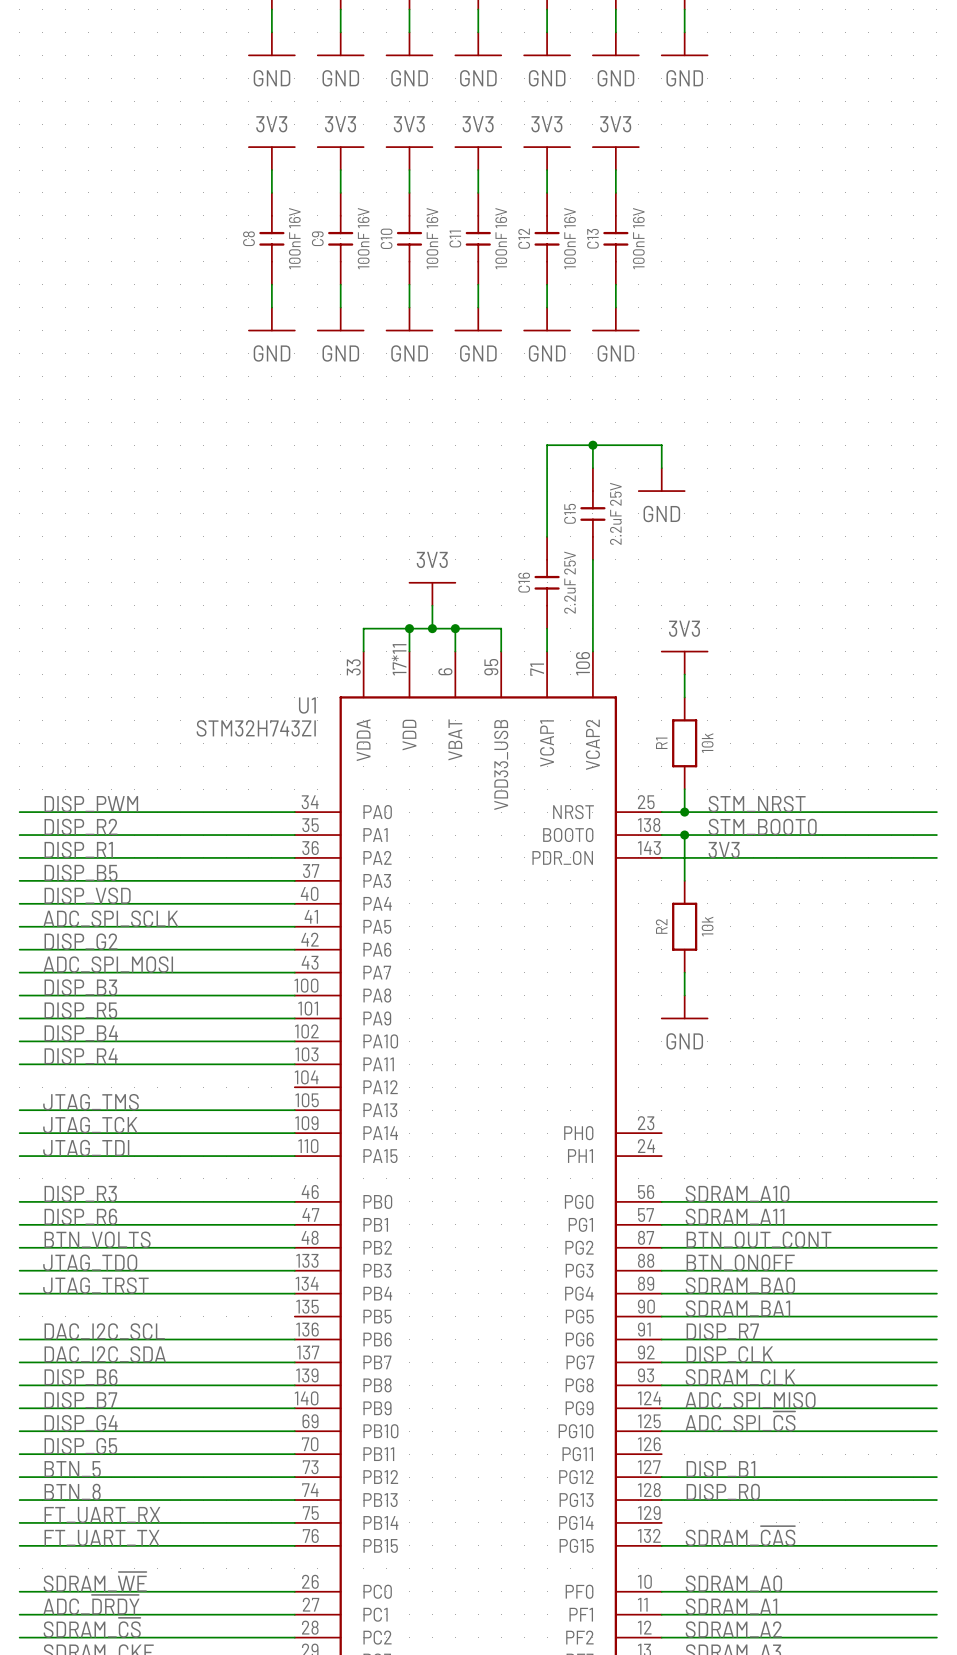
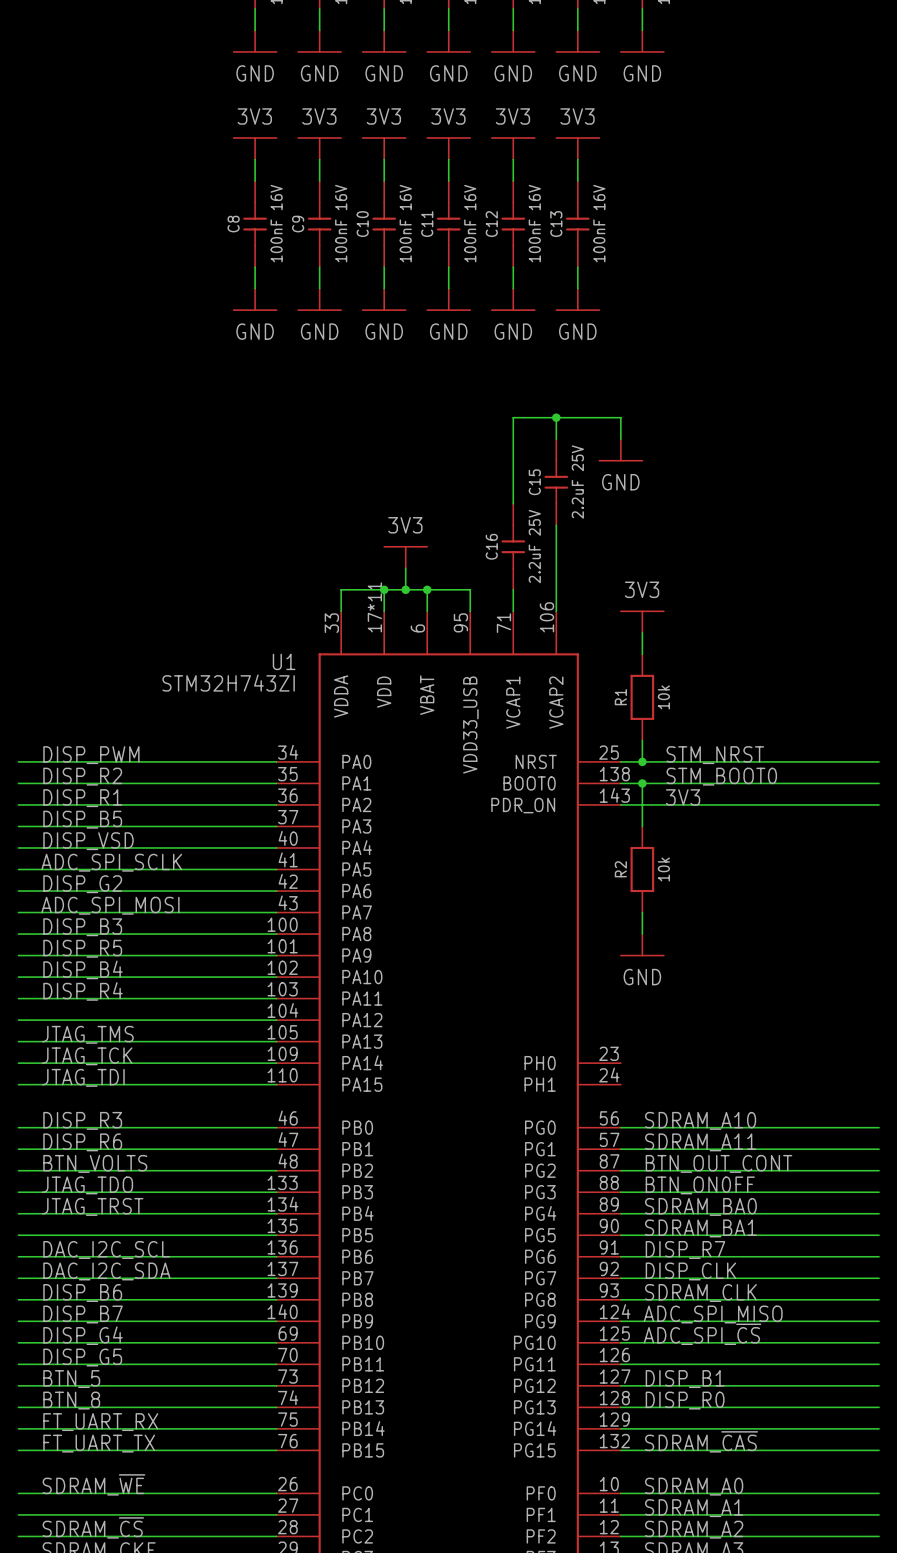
wire: none -> (18, 1020) (276, 1020)
wire: none -> (18, 1235) (276, 1235)
wire: none -> (620, 1364) (879, 1364)
wire: none -> (620, 1428) (879, 1428)
label: ADC_~{DRDY} (91, 1604) -> none

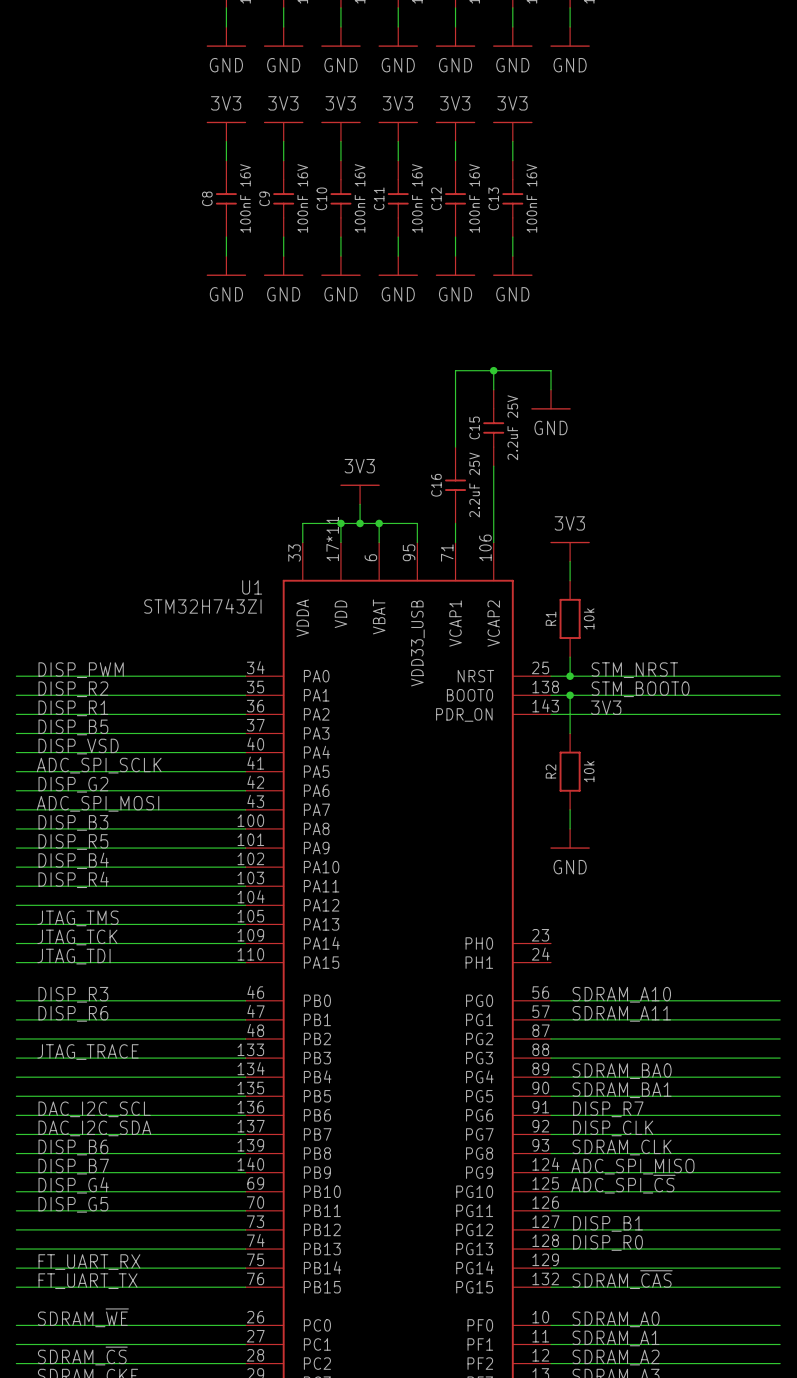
label: BTN_VOLTS (95, 1163) -> none
label: BTN_OUT_CONT (719, 1163) -> none
label: JTAG_TDO (87, 1185) -> JTAG_TRACE (88, 1052)
label: BTN_ON0FF (700, 1185) -> none
label: JTAG_TRST (92, 1206) -> none
label: BTN_5 (71, 1379) -> none
label: BTN_8 (71, 1400) -> none

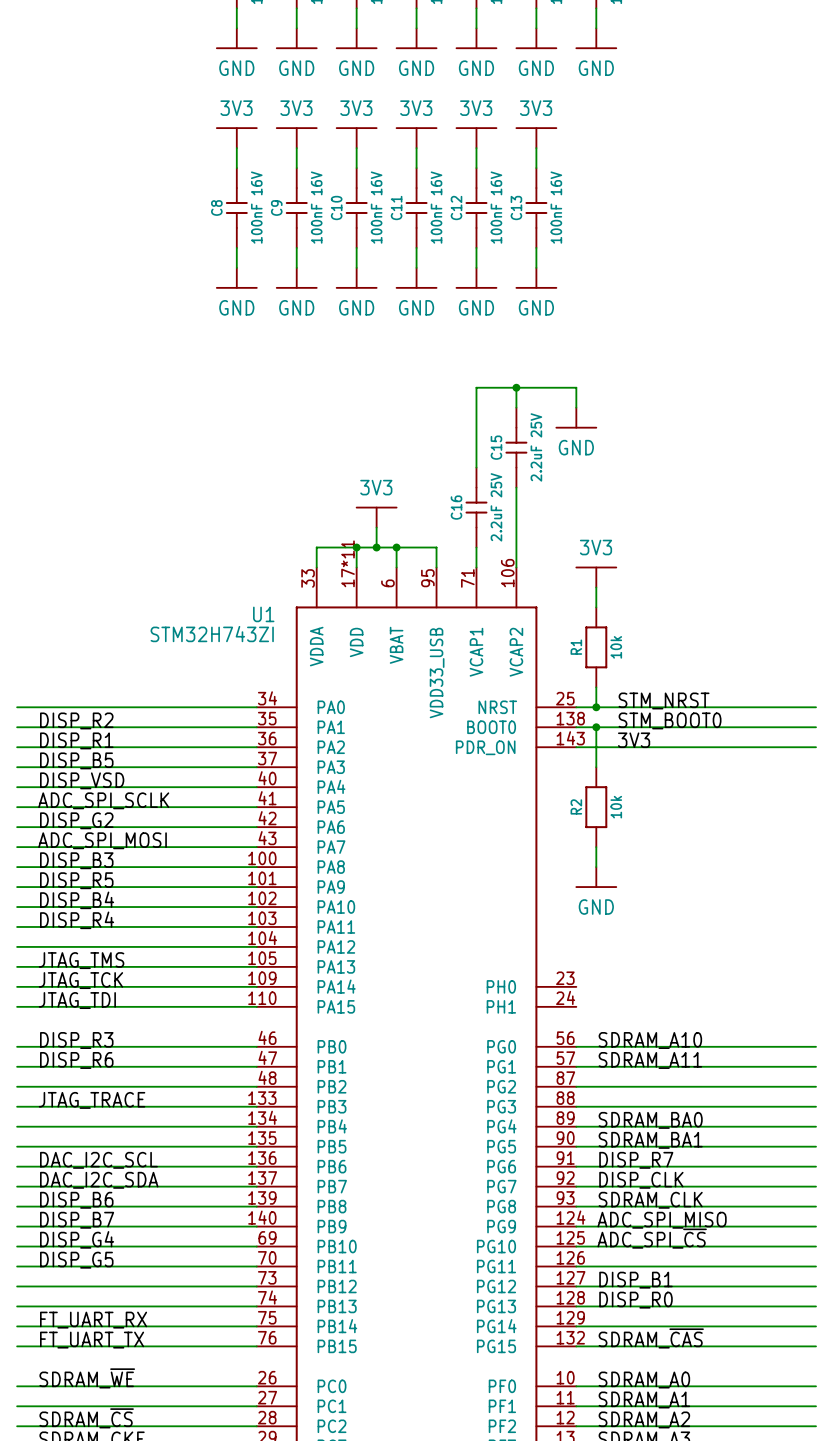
label: DISP_PWM (81, 670) -> none

